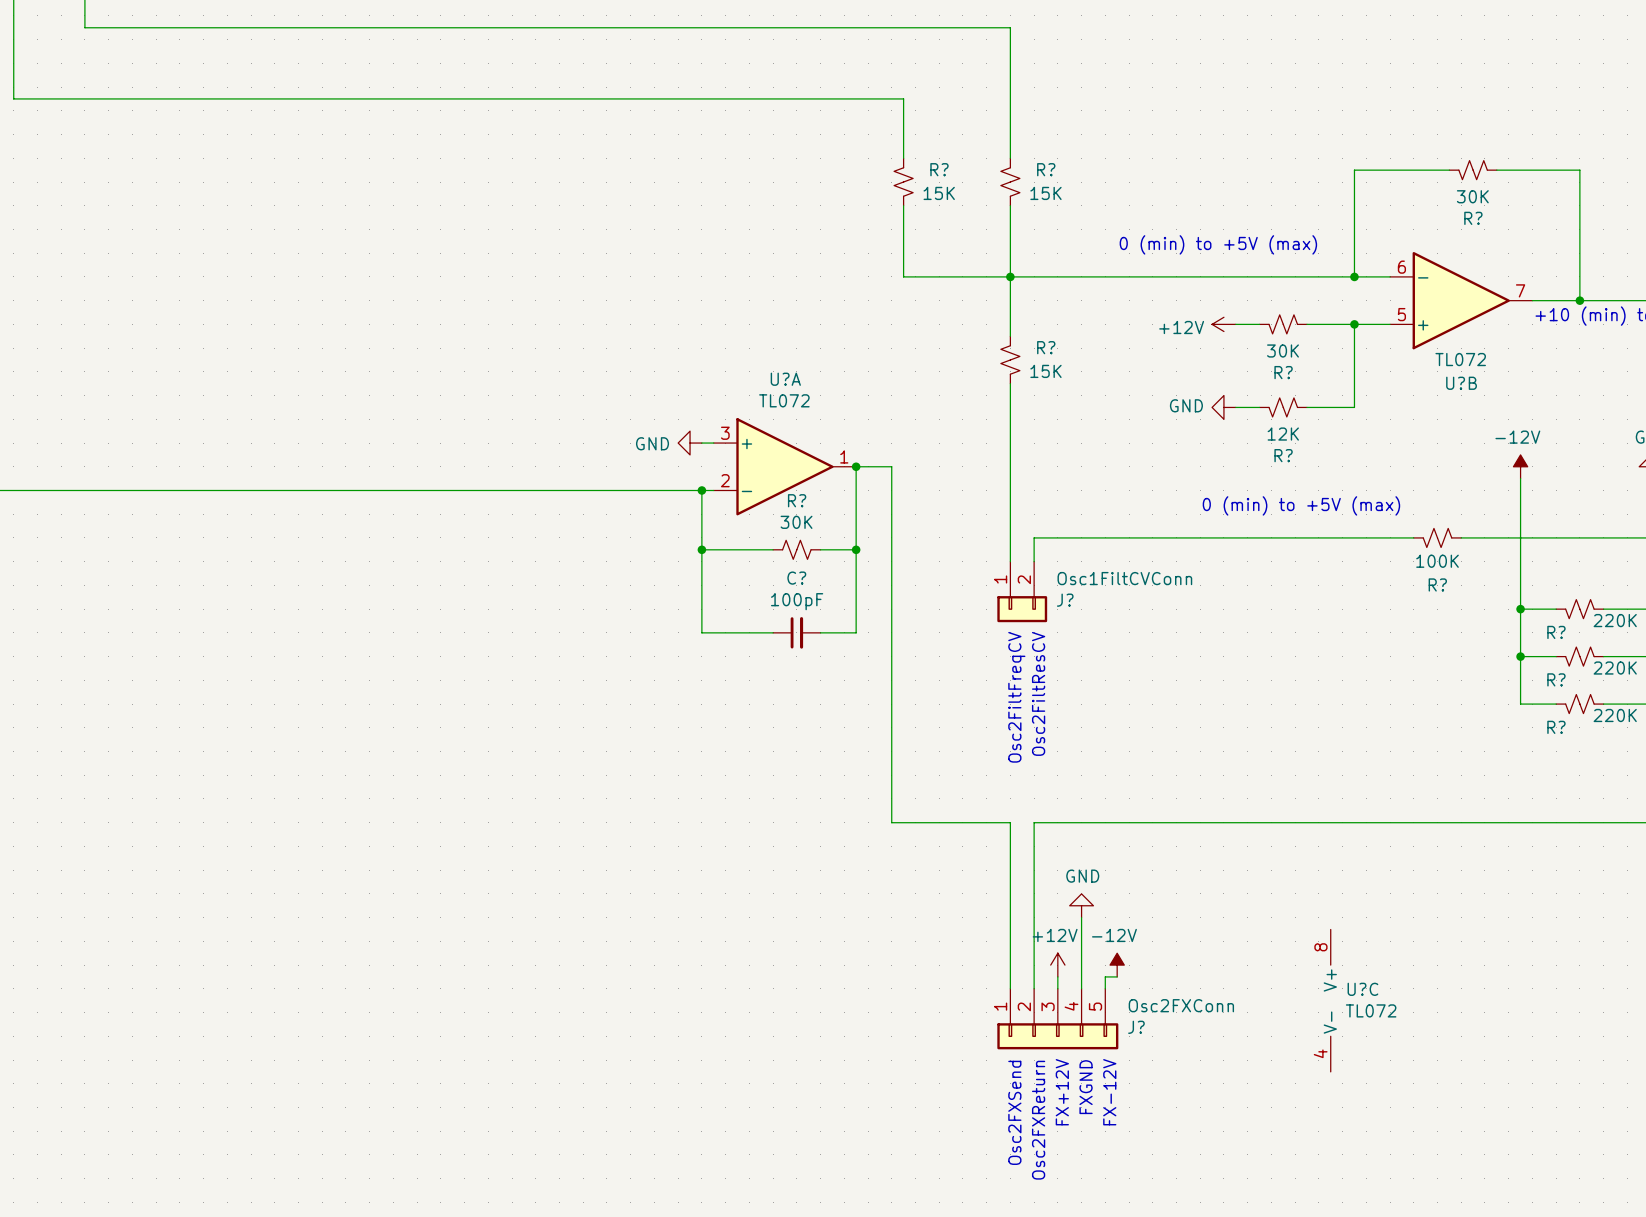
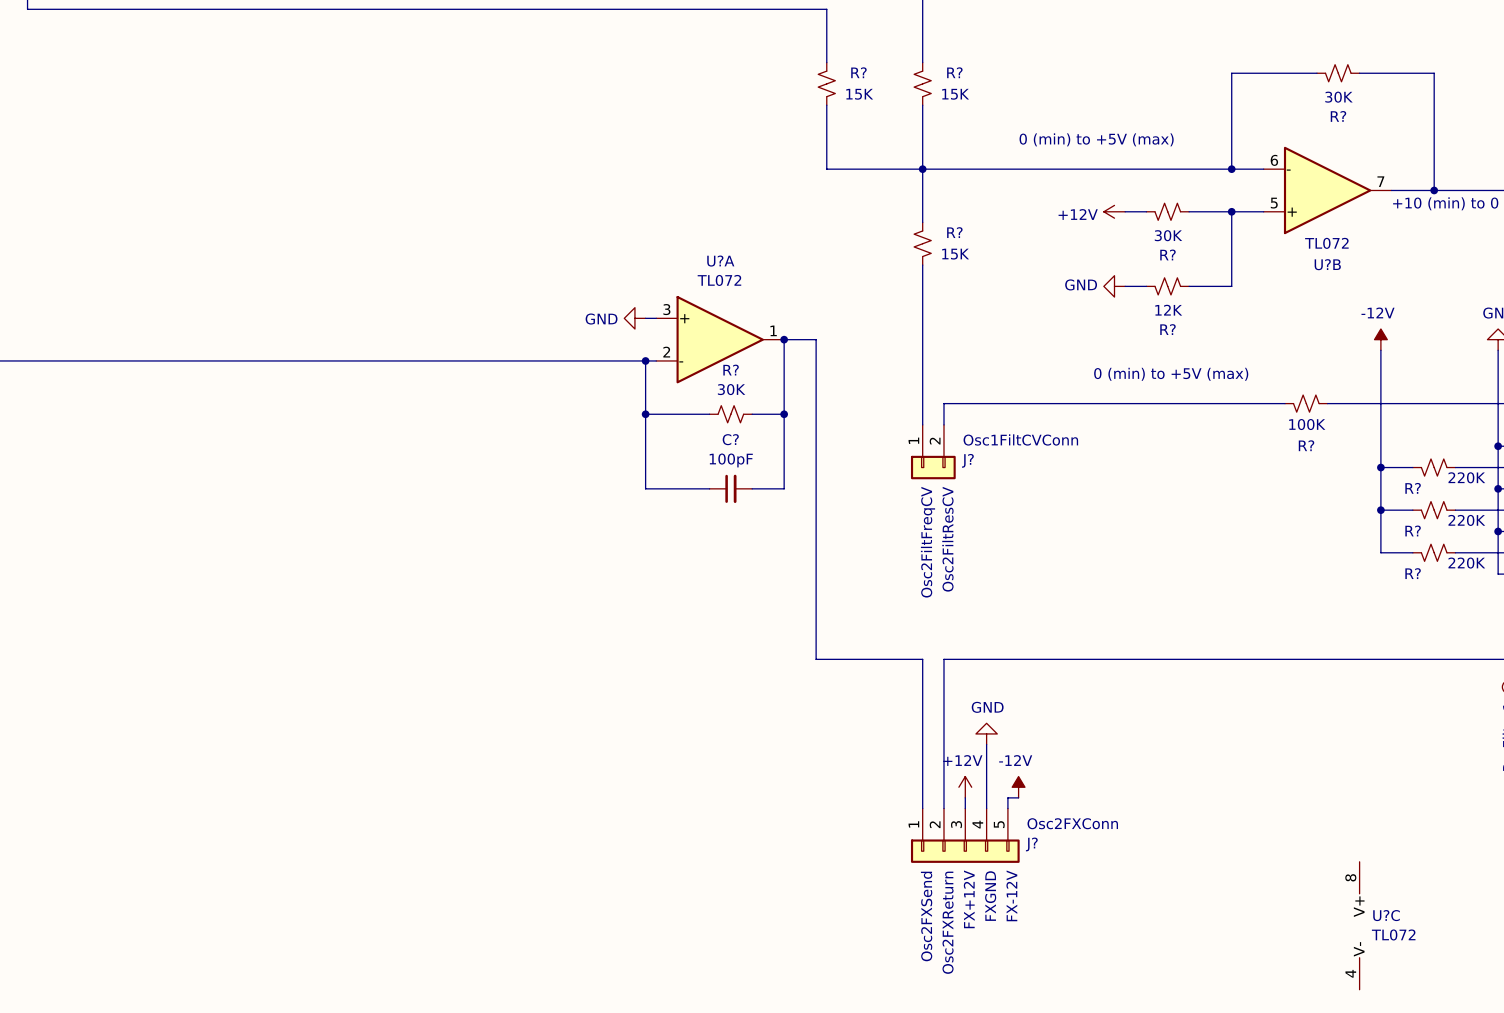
U?C position: (1330, 1000) -> (1359, 925)

